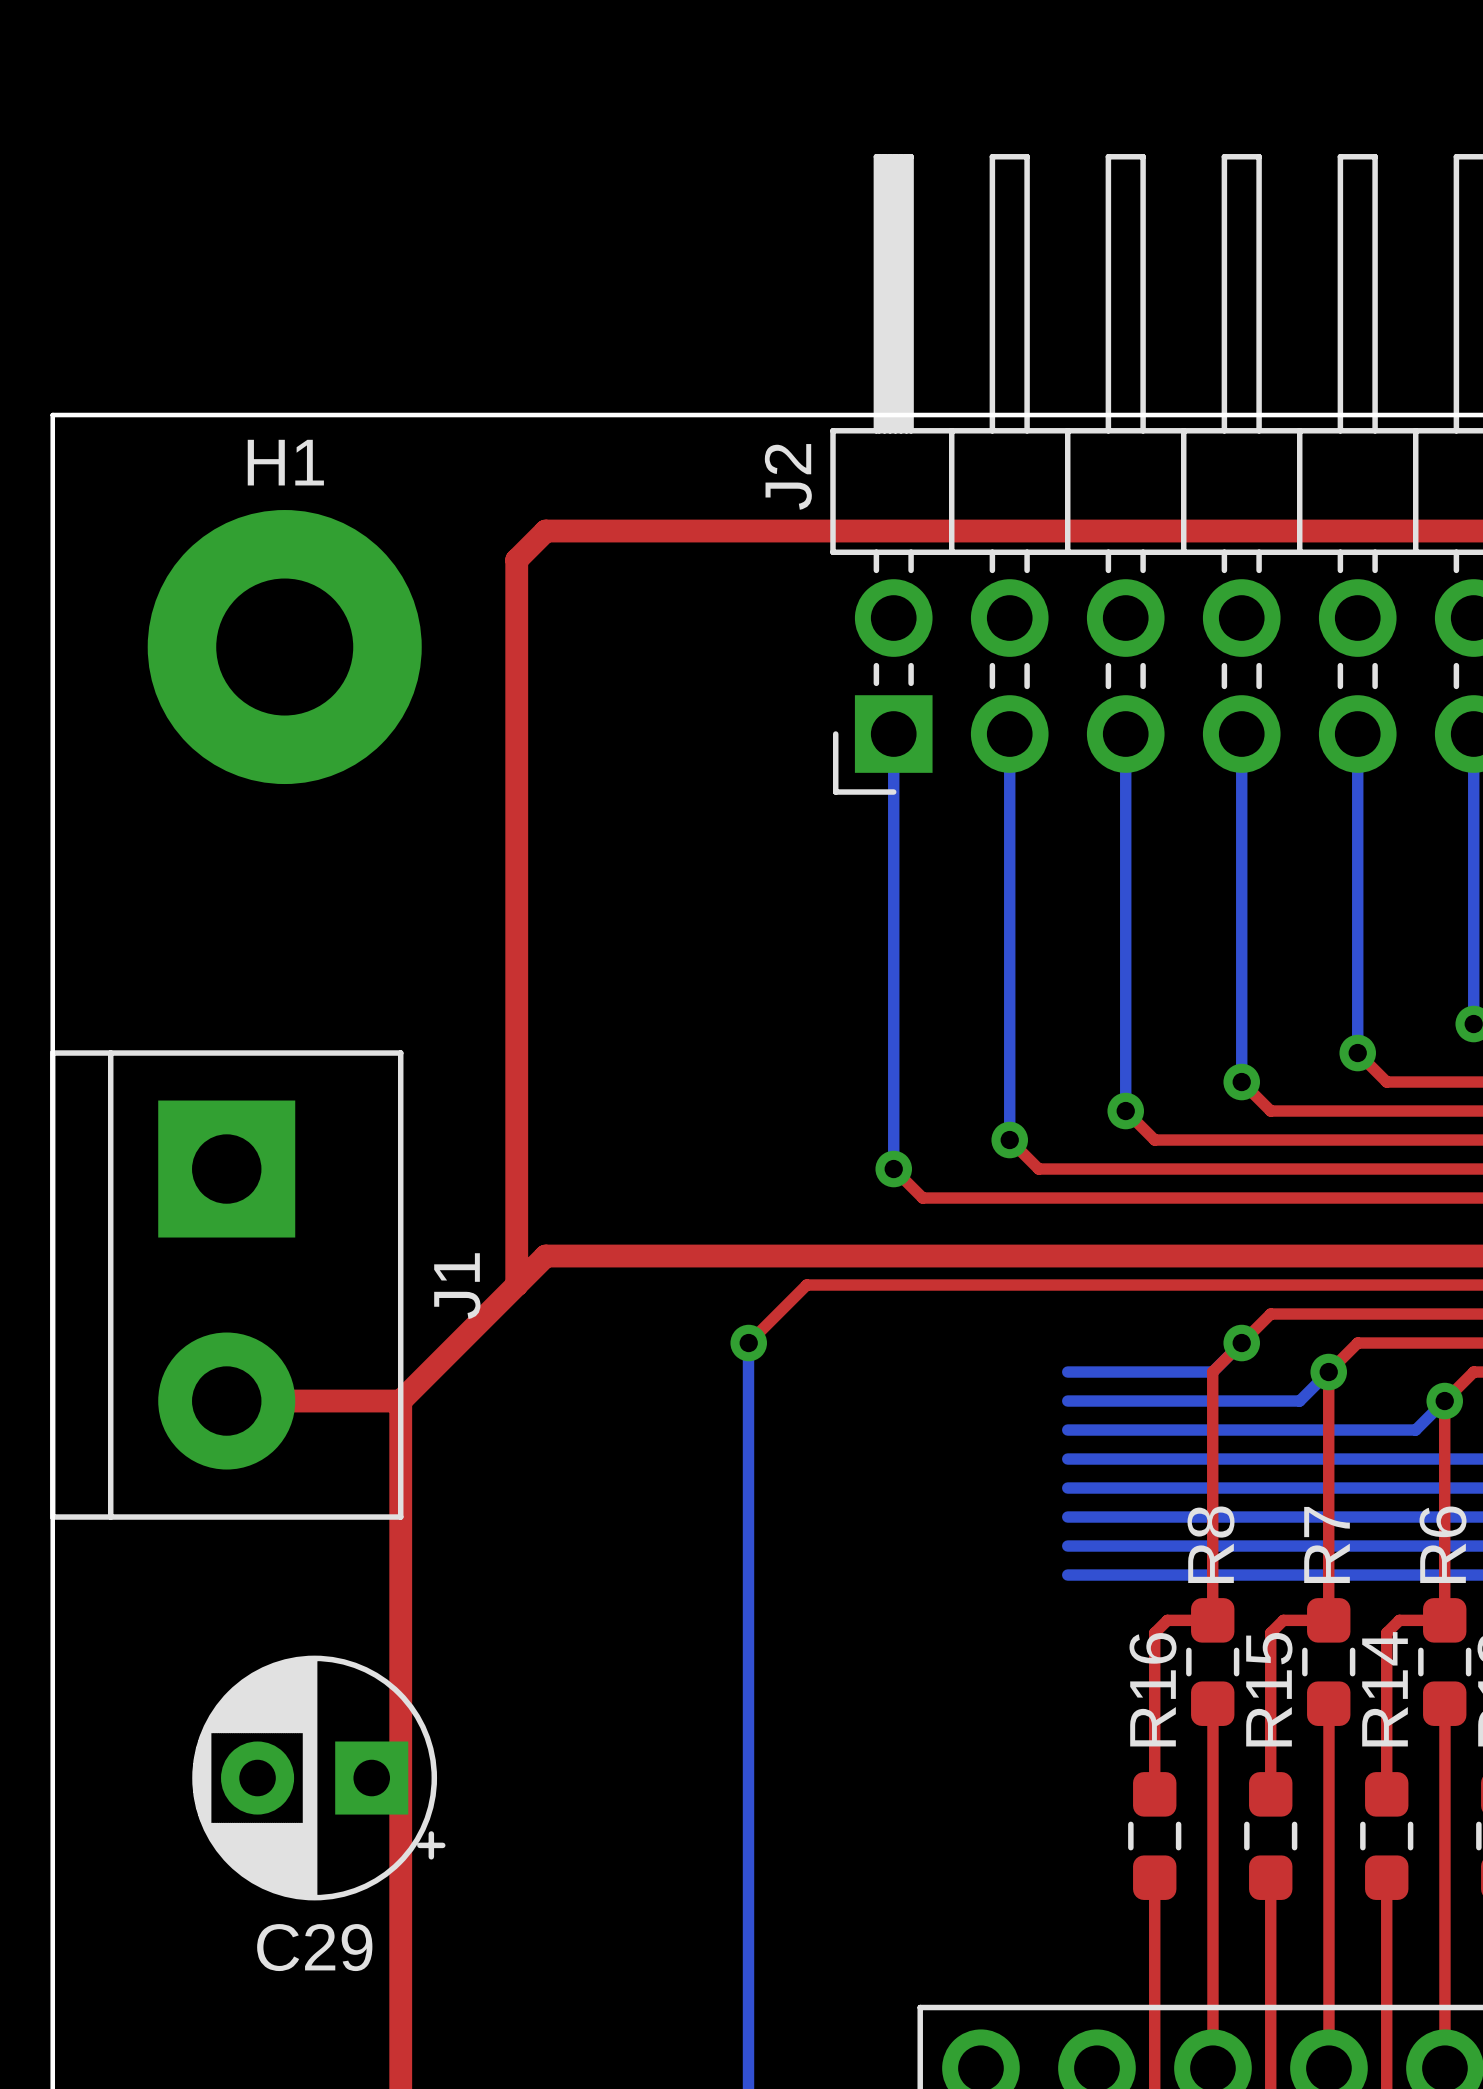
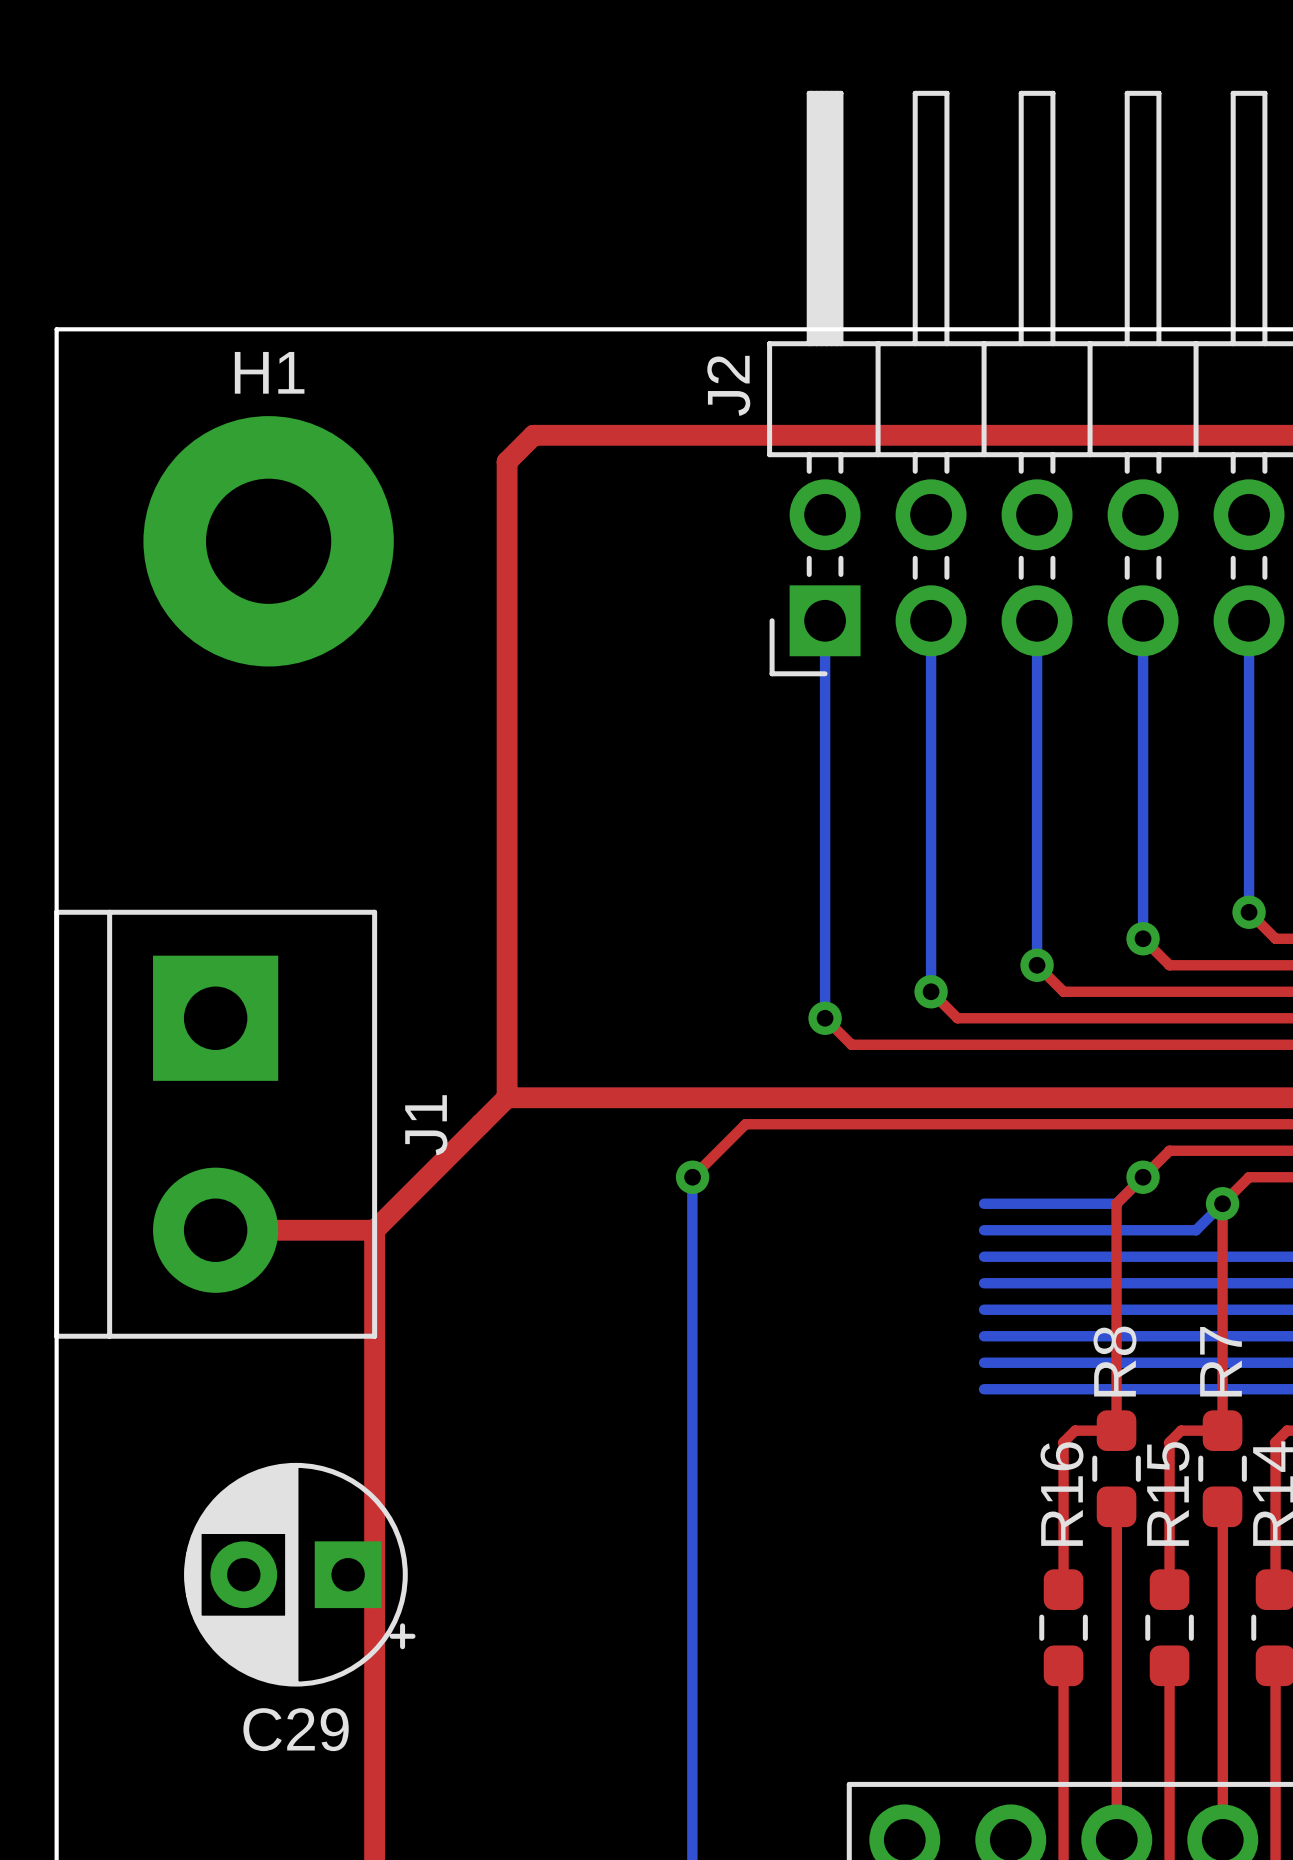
top track: (574, 531) (545, 531) (516, 560) (516, 1285) -> (533, 435) (507, 461) (507, 1097)

